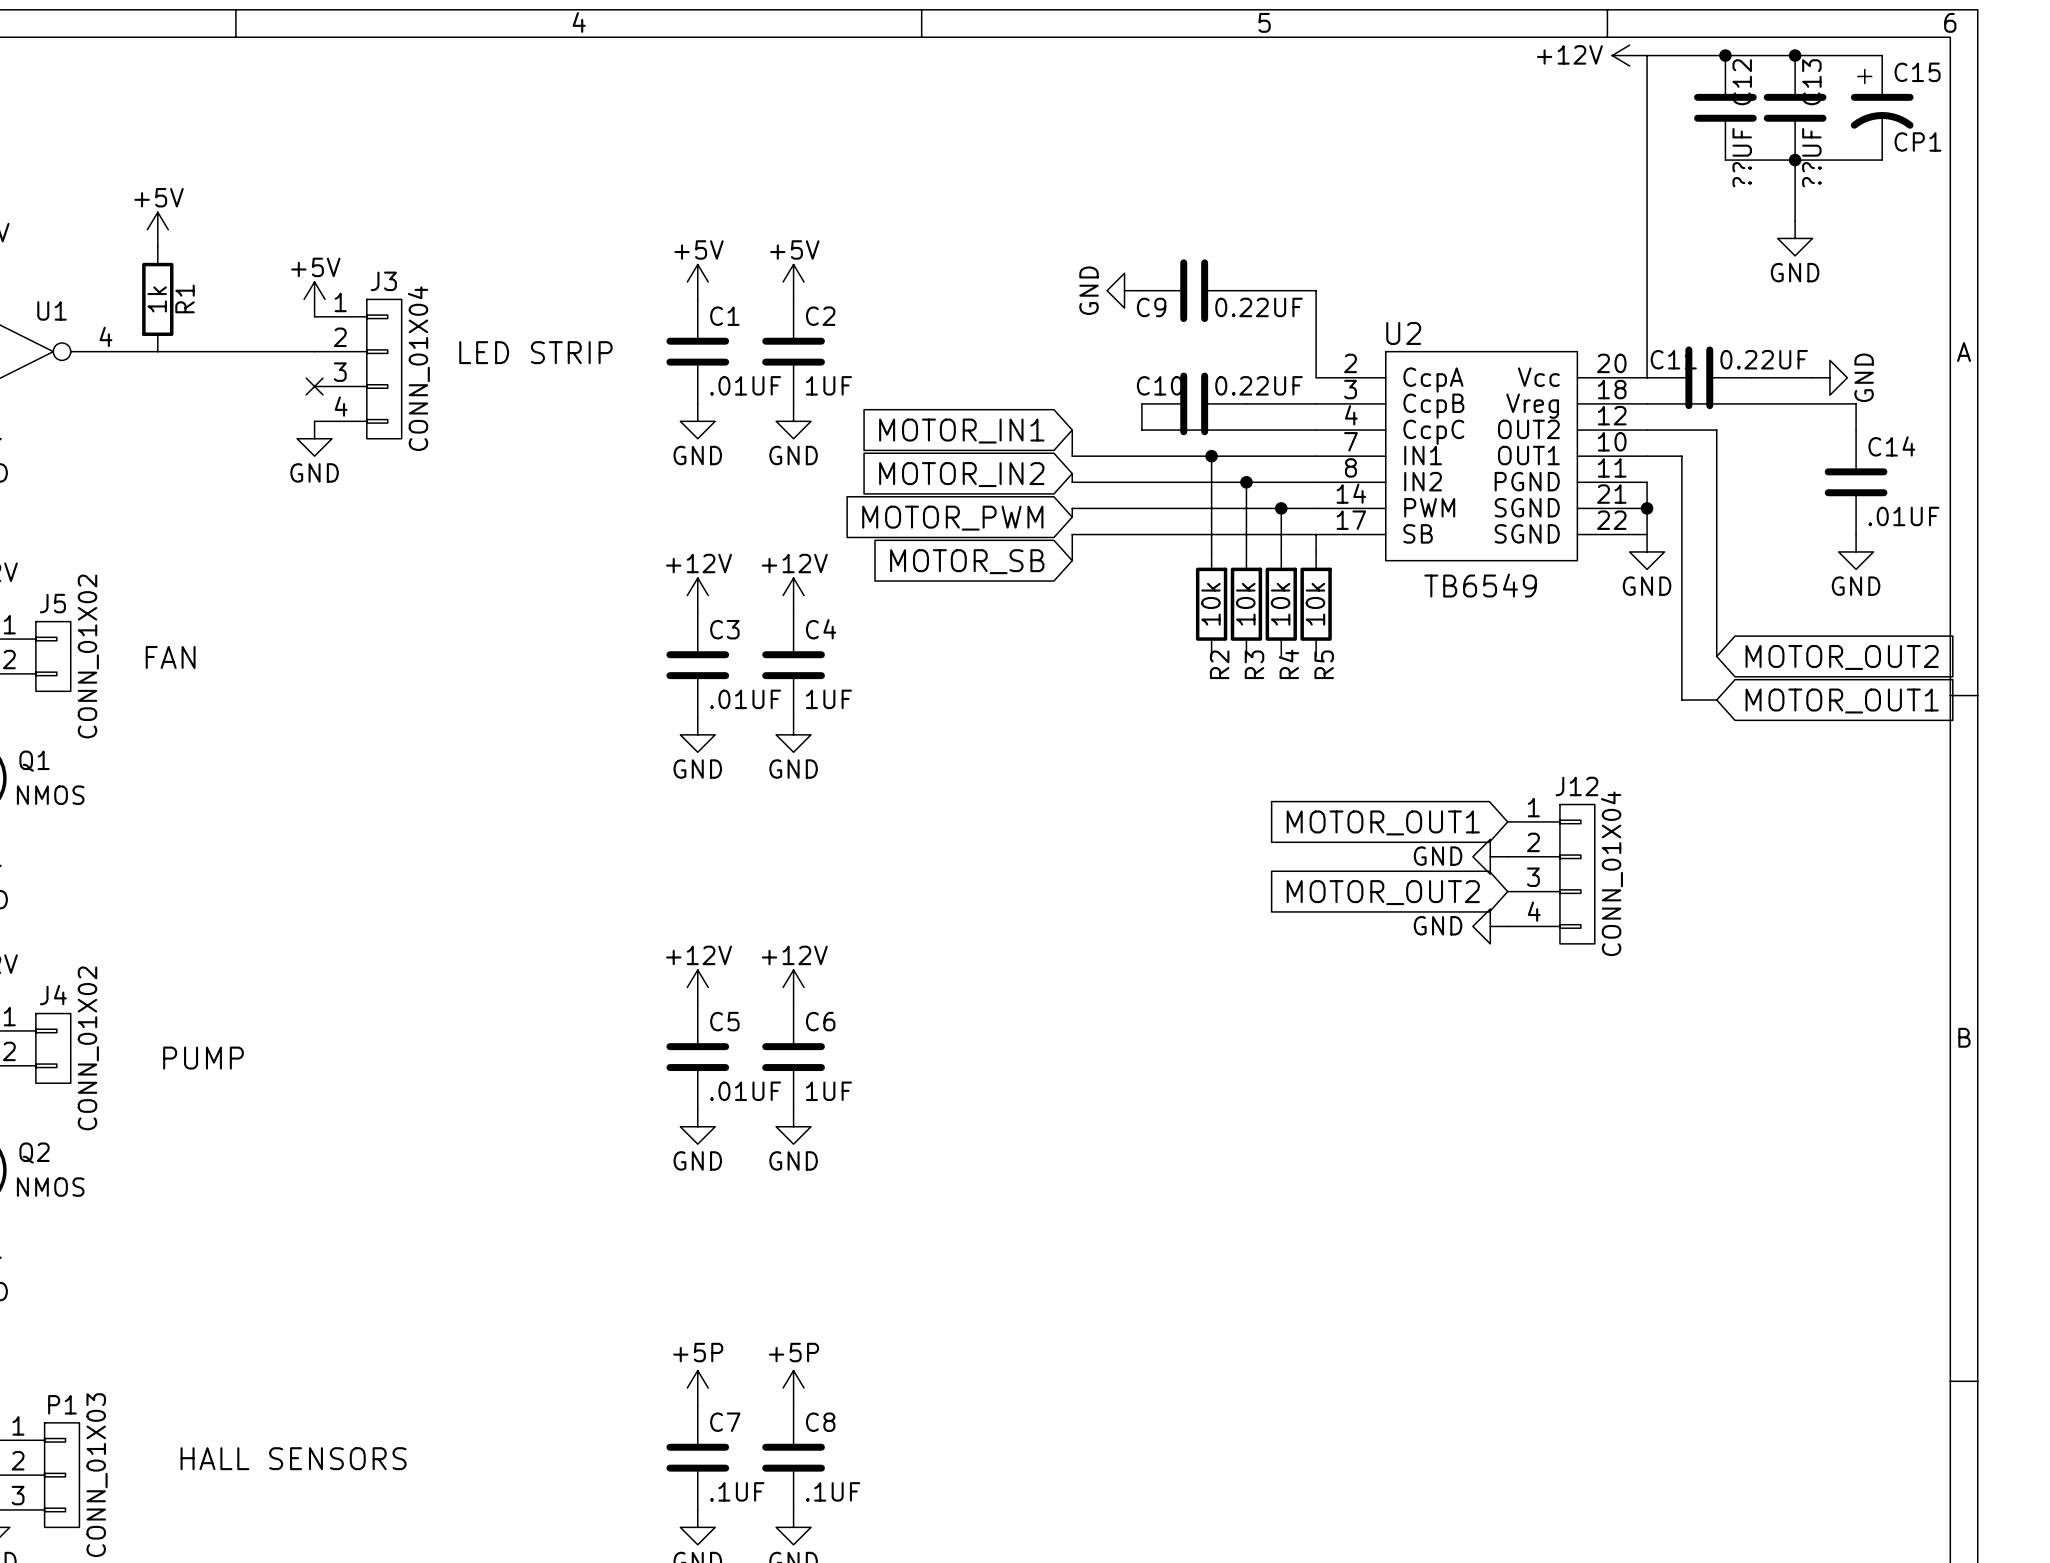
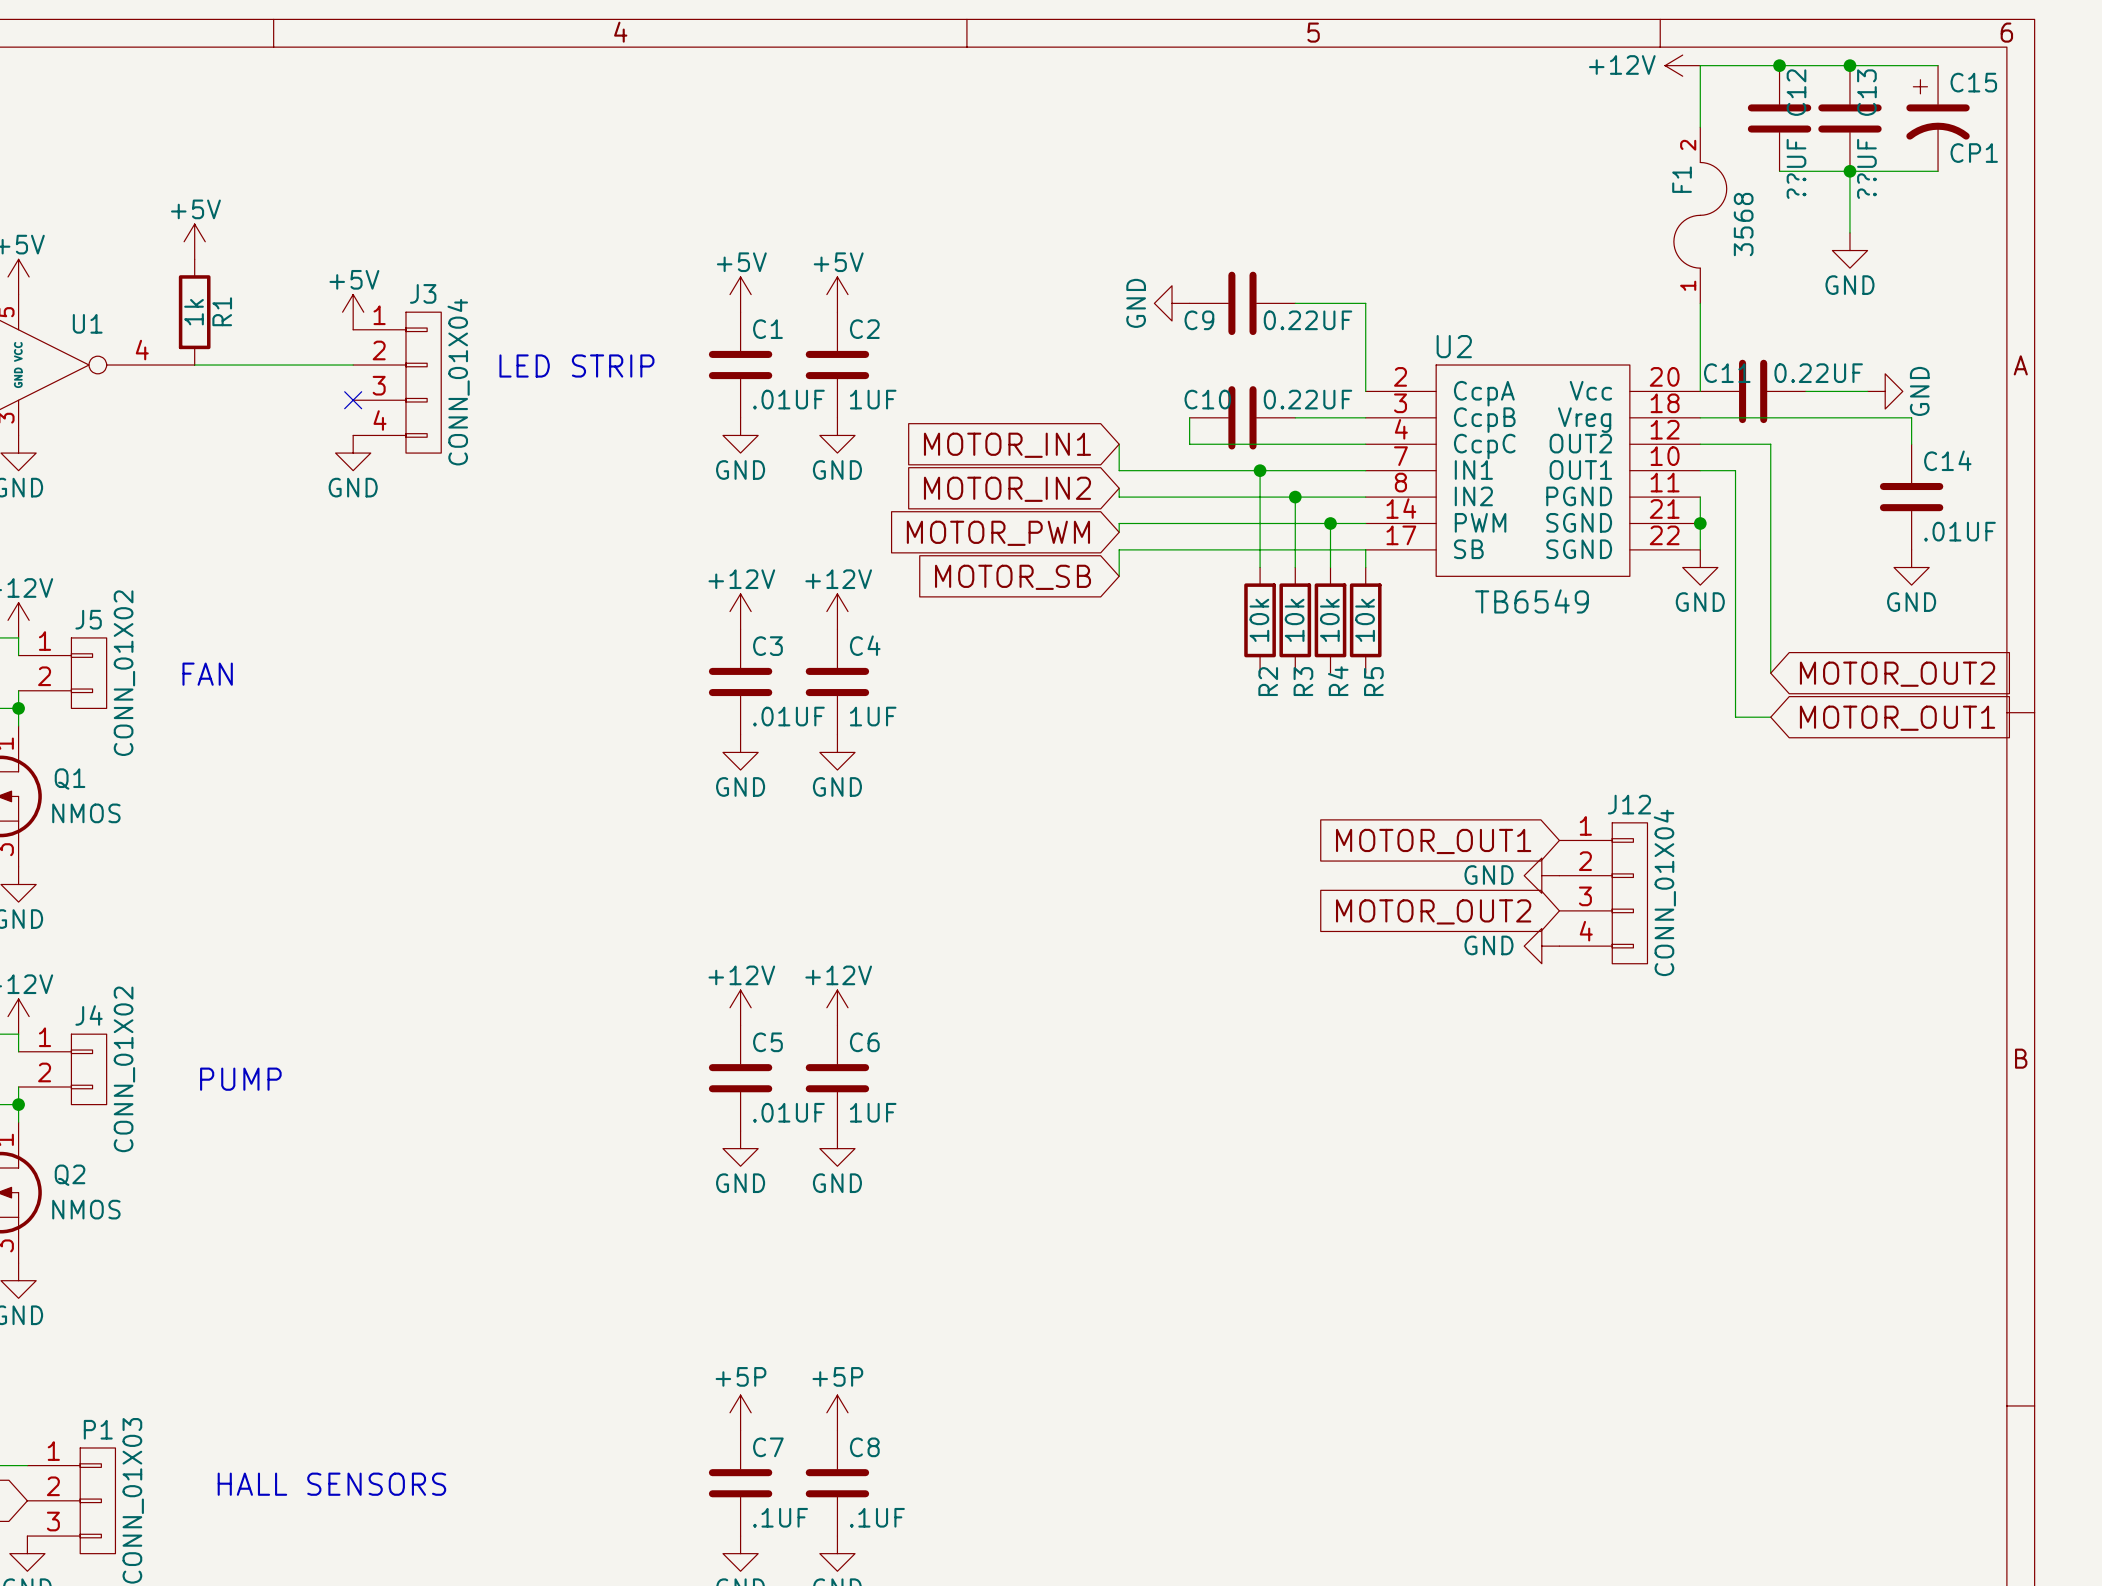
wire: (1647, 116) (1647, 290) -> none
F1: none -> 3568 (1700, 215)

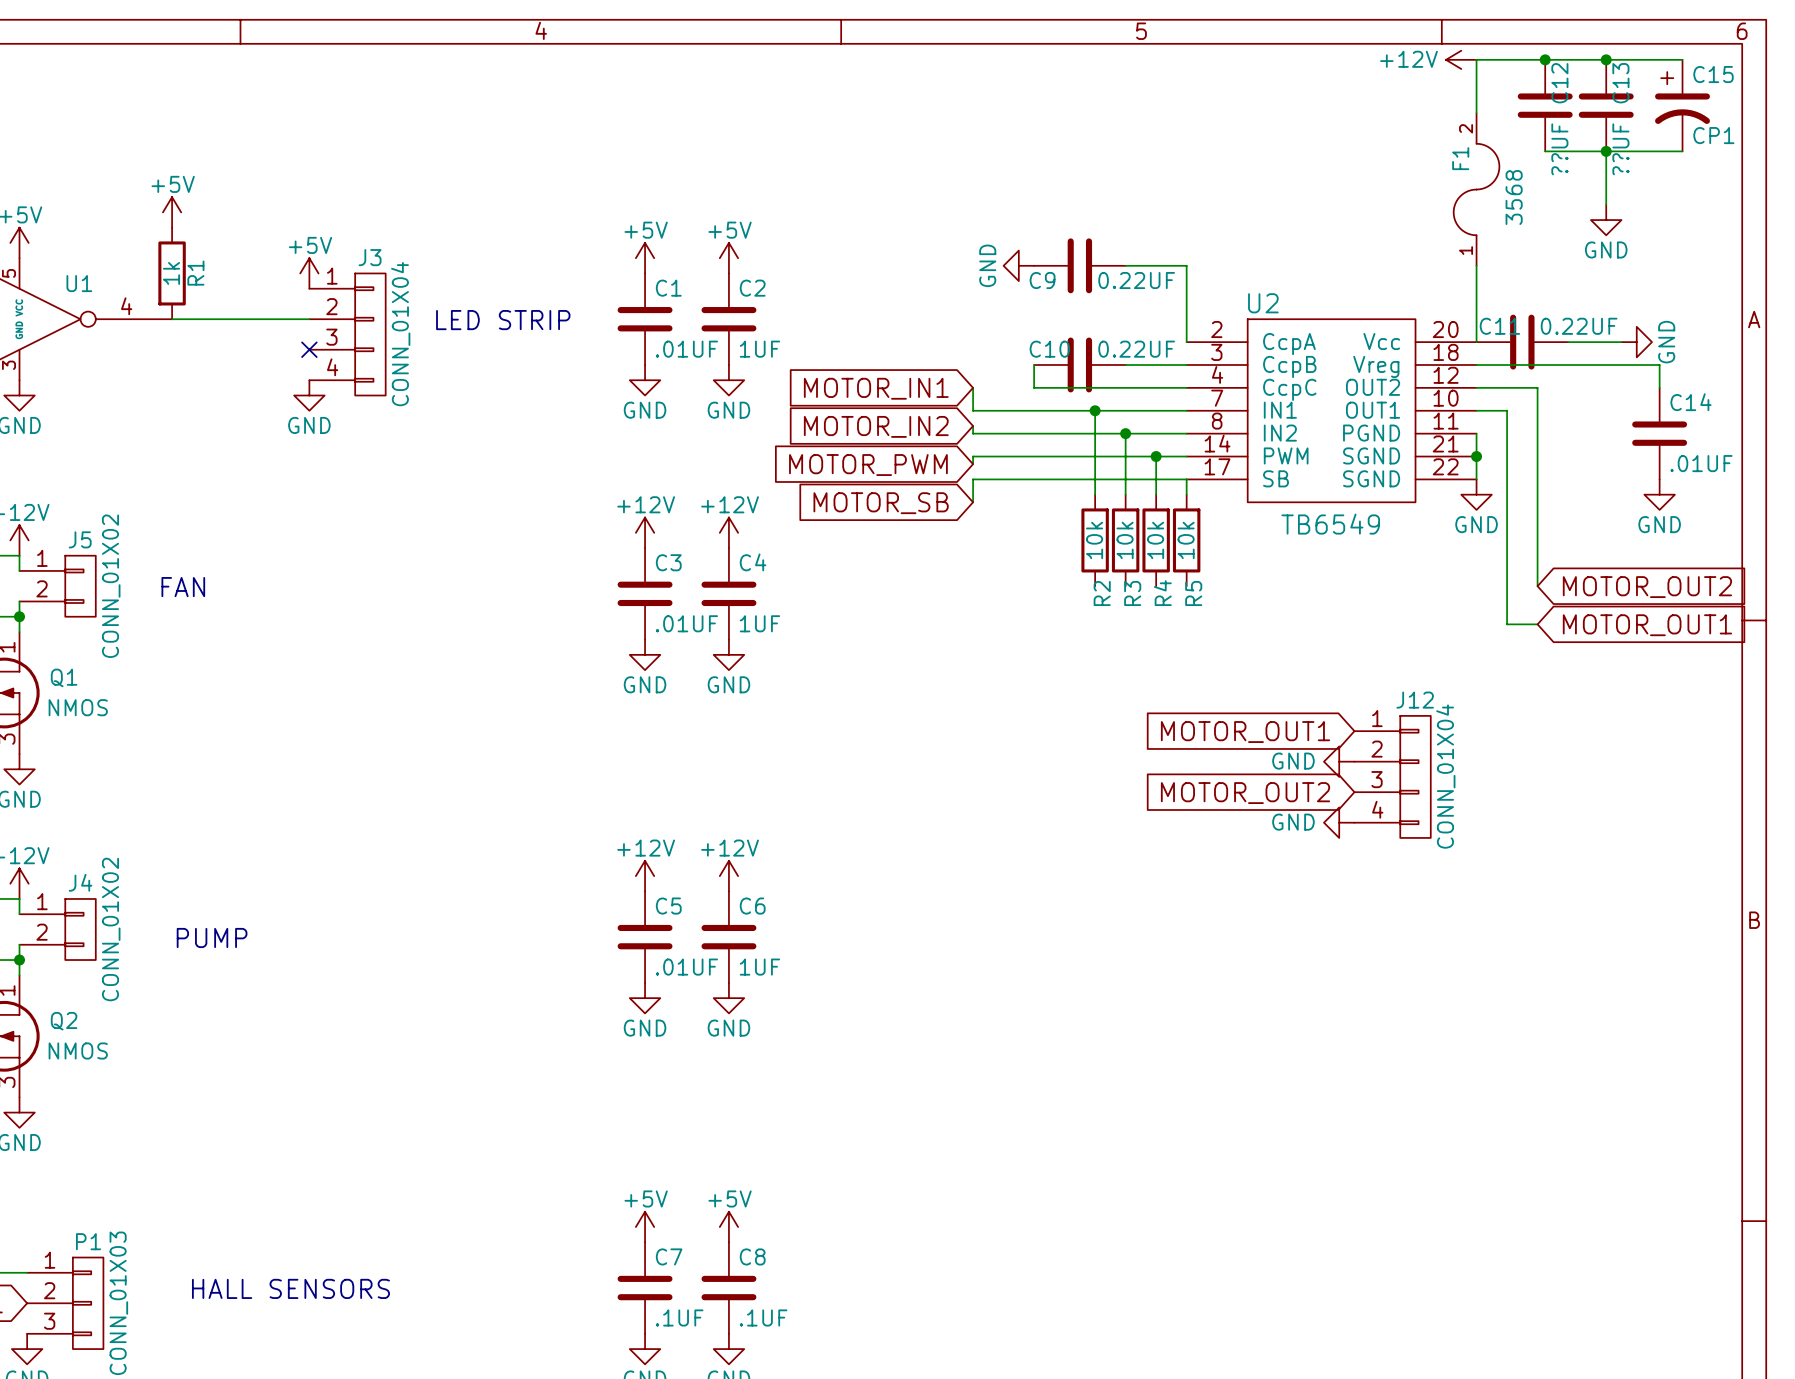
power symbol: +5P (740, 1412) -> +5V (645, 1227)
power symbol: +5P (837, 1412) -> +5V (728, 1227)

